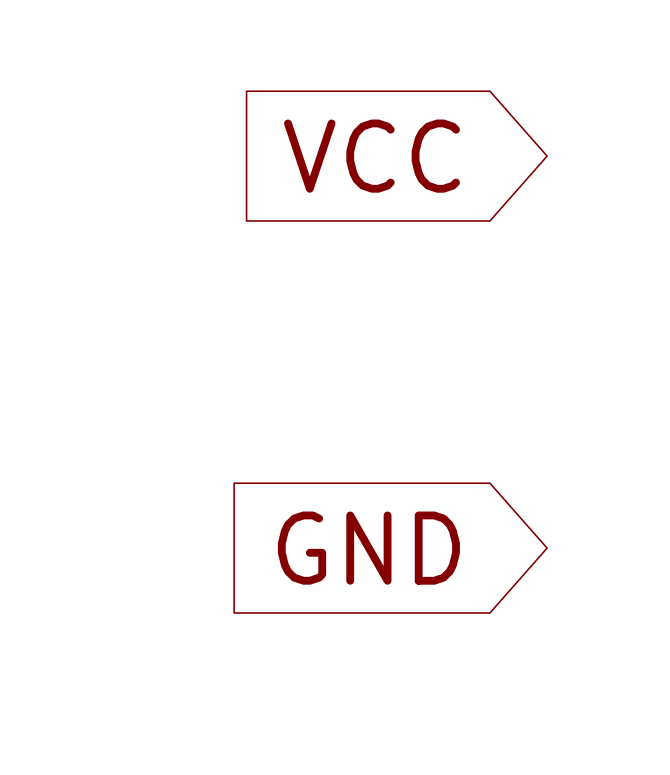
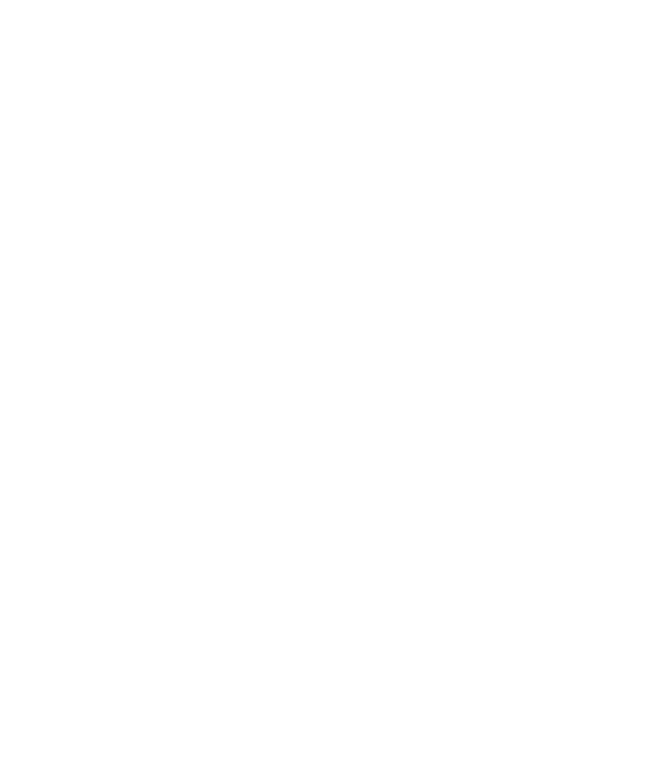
global label: VCC (372, 156) -> none
global label: GND (368, 548) -> none

